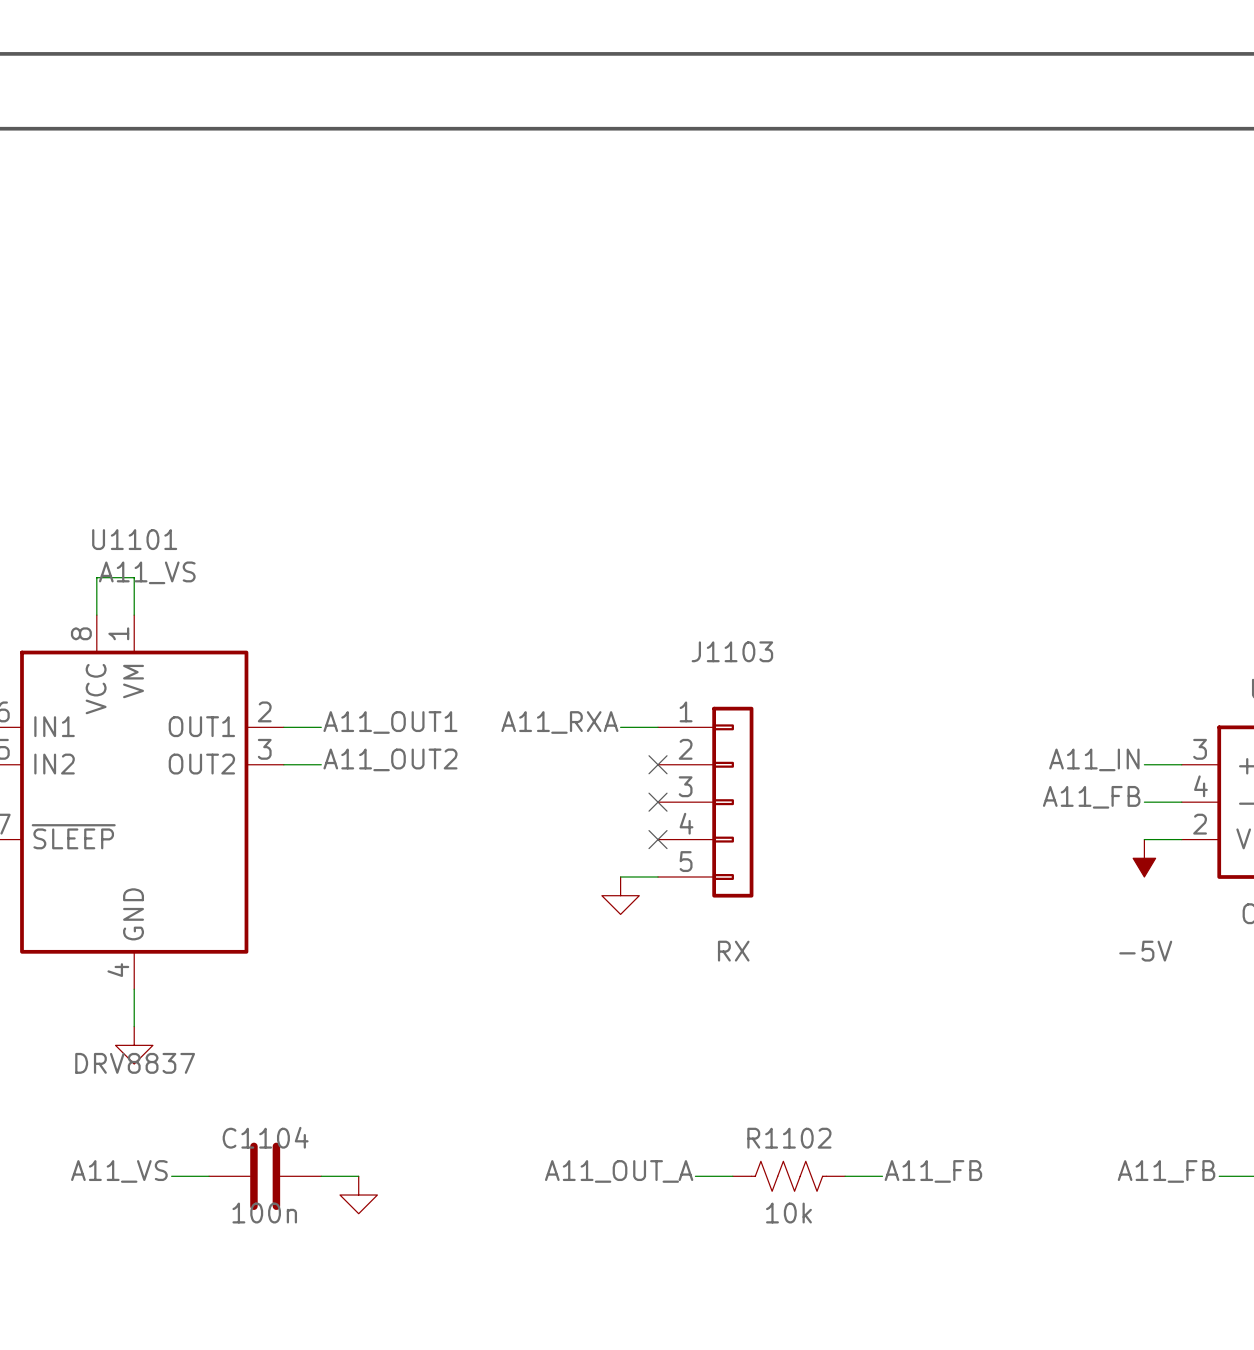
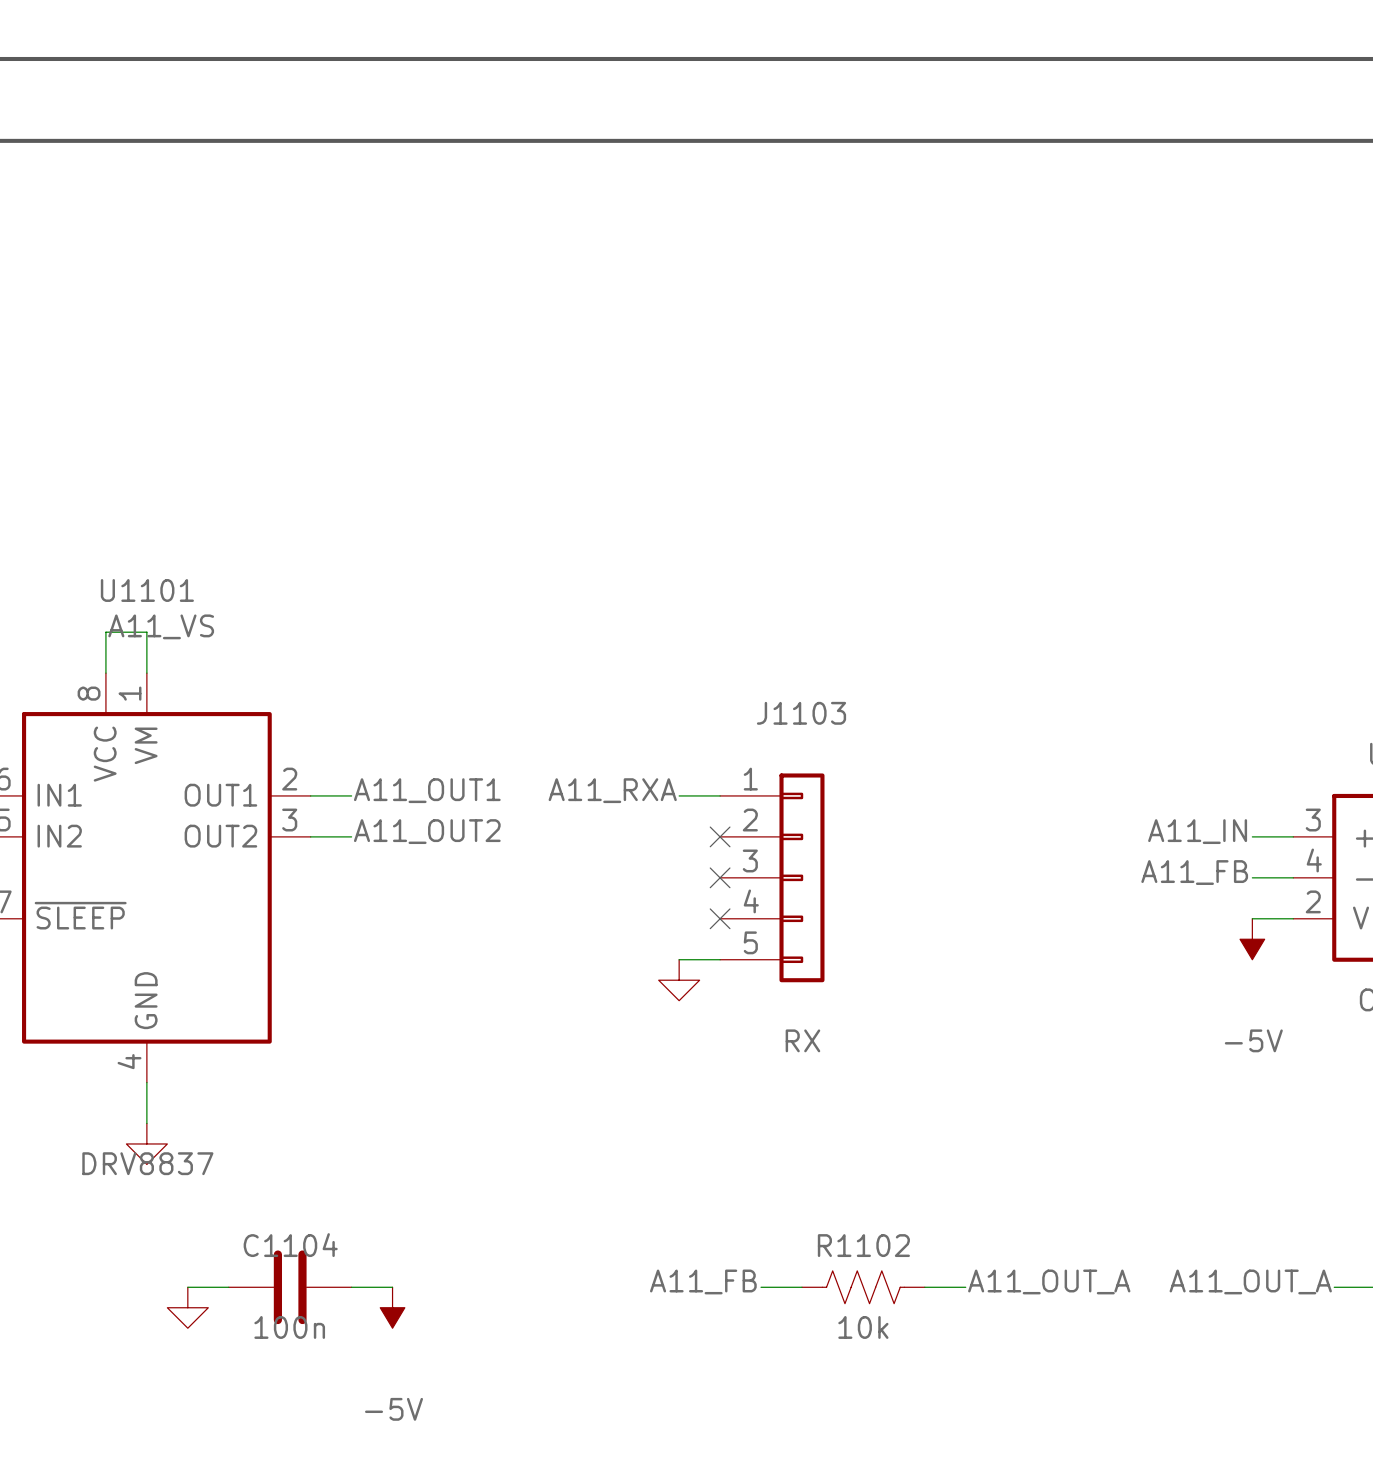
label: A11_VS (119, 1171) -> none
label: A11_OUT_A (619, 1171) -> A11_FB (703, 1281)
label: A11_FB (933, 1171) -> A11_OUT_A (1049, 1281)
label: A11_FB (1166, 1171) -> A11_OUT_A (1250, 1281)
power symbol shape: [340, 1176, 378, 1214] -> [380, 1287, 405, 1329]
power symbol: none -> (187, 1307)
power symbol text: none -> -5V (394, 1409)

